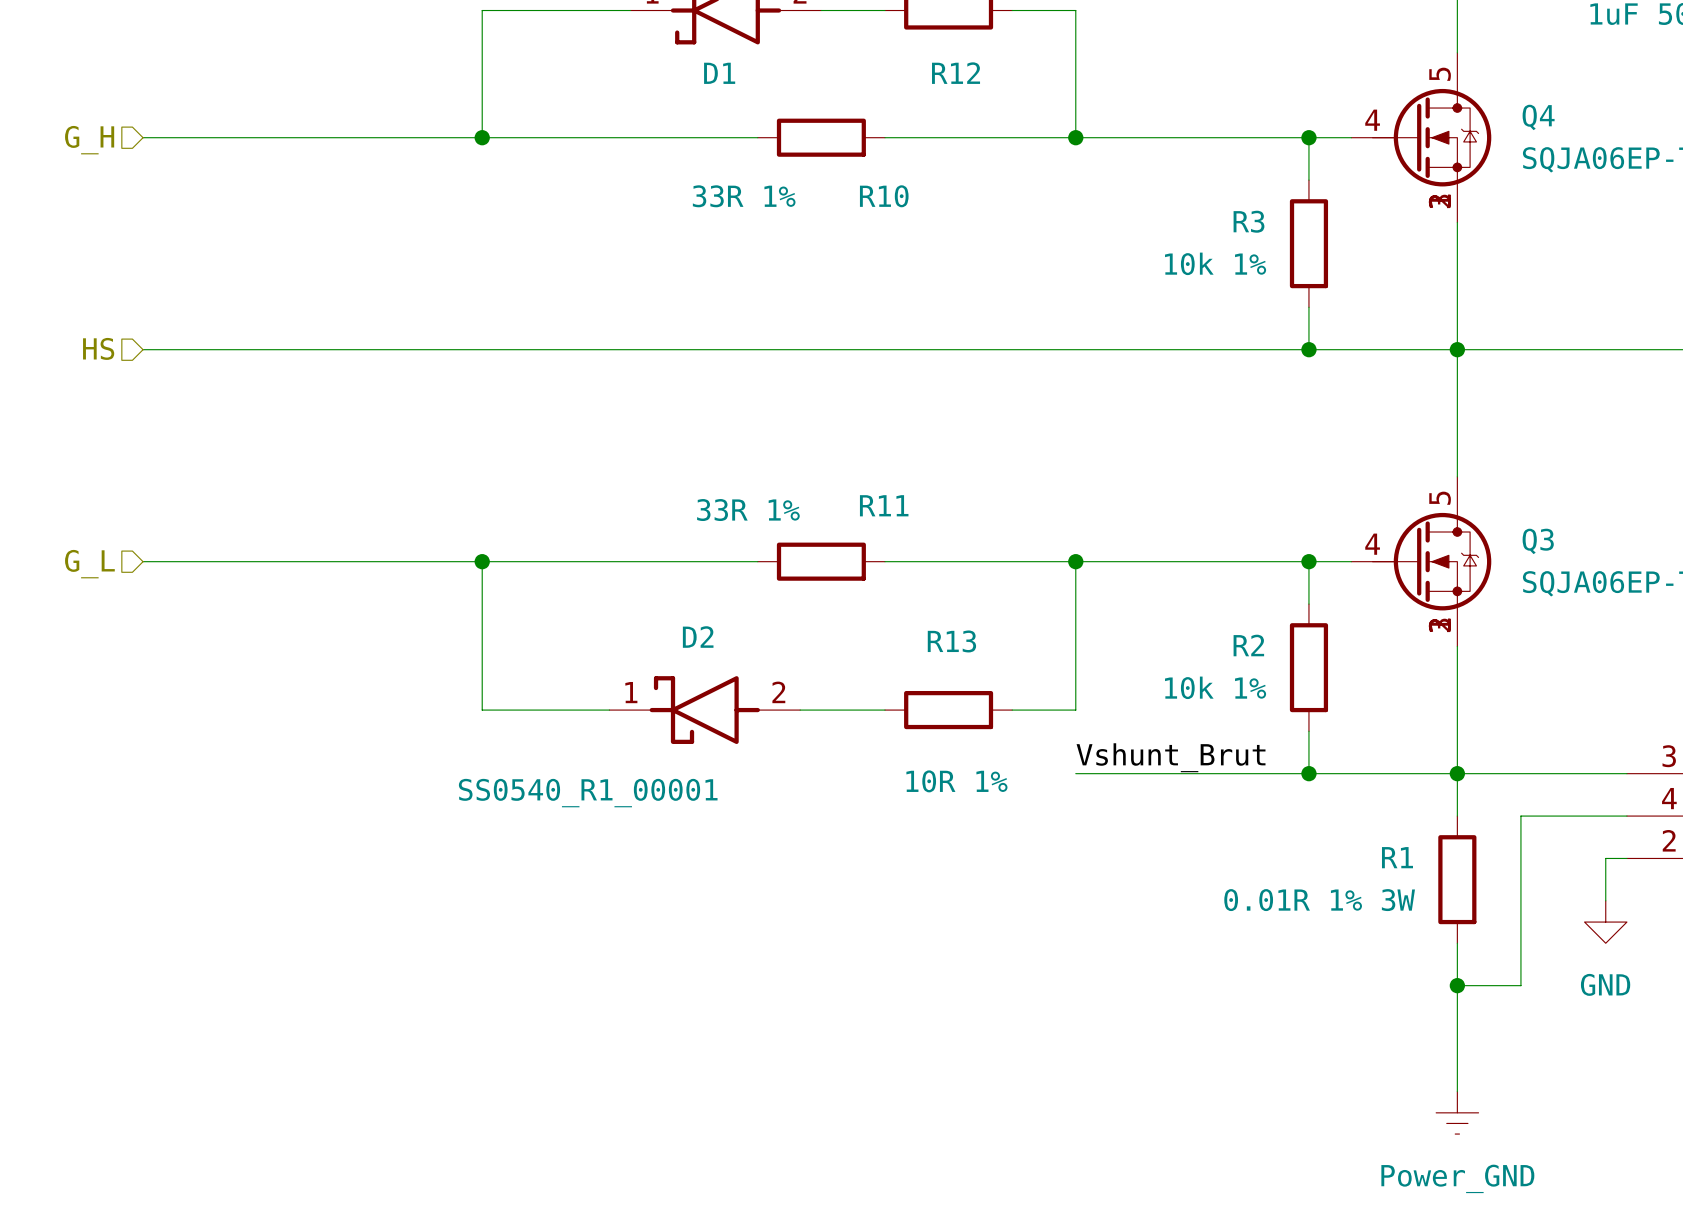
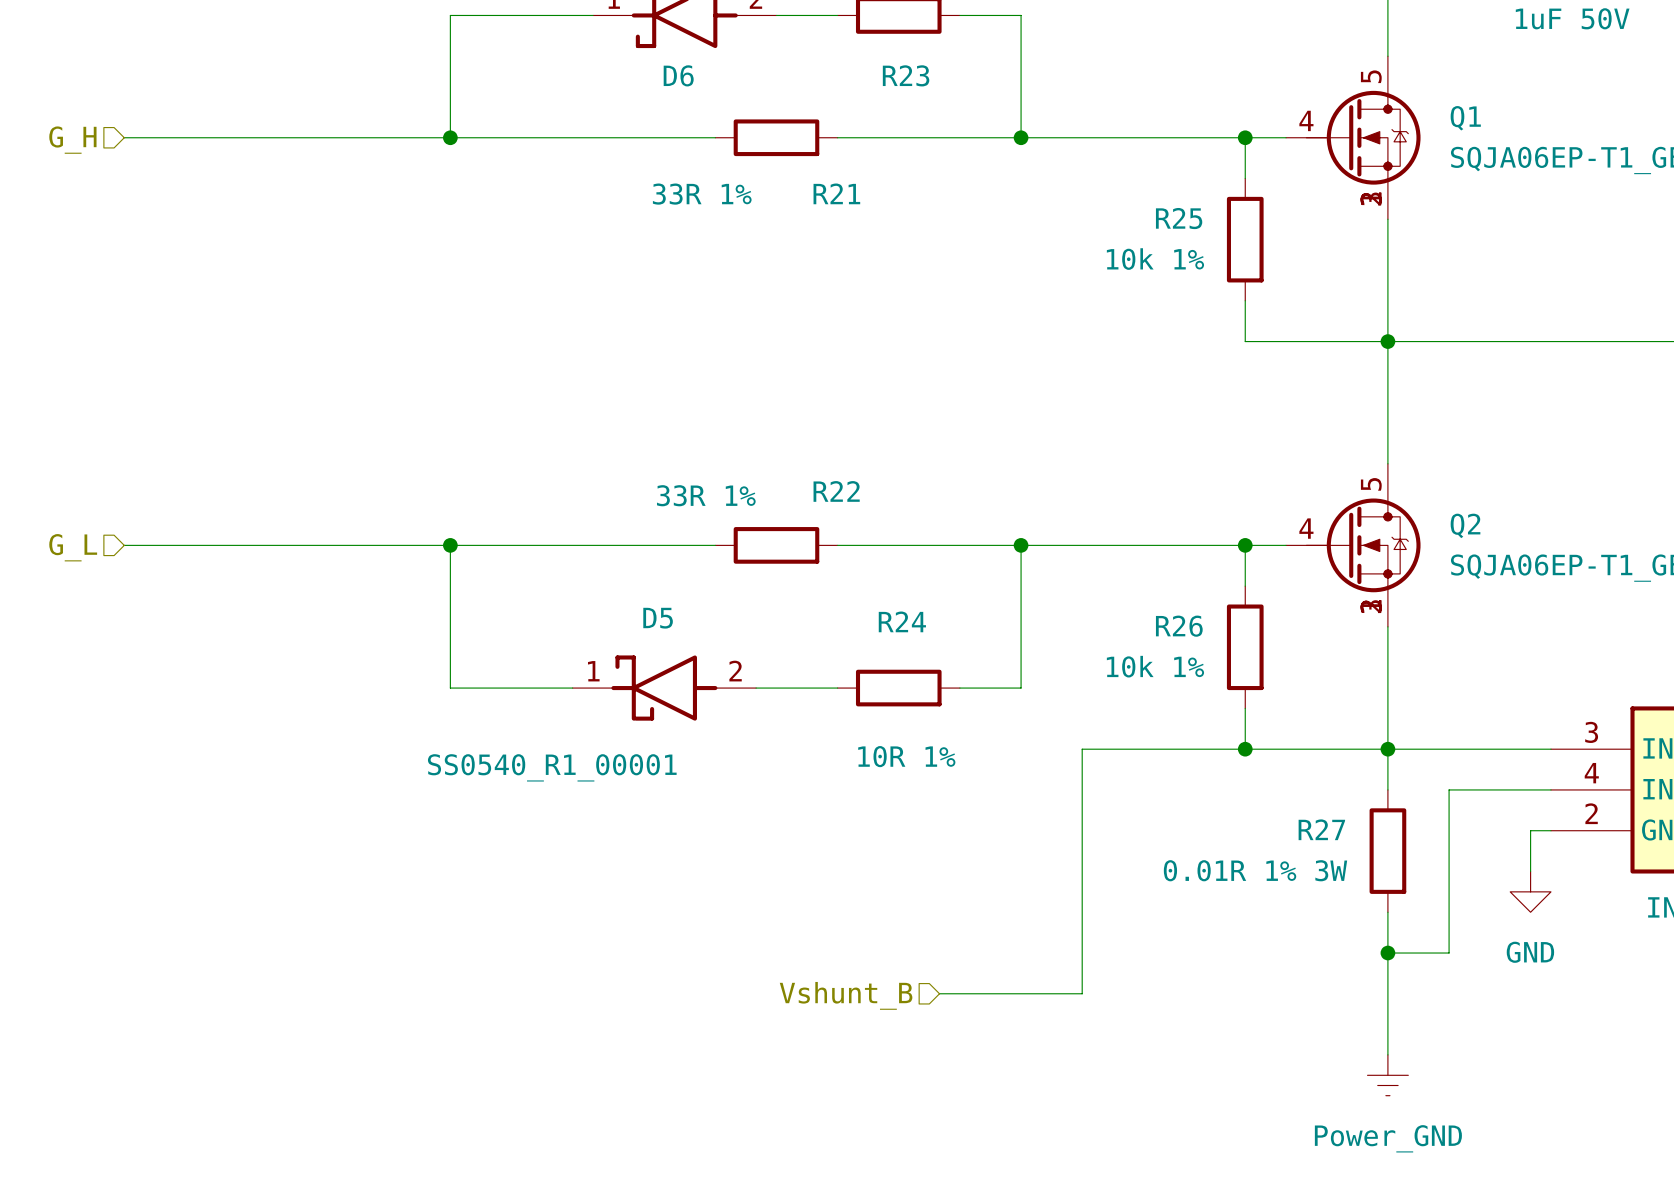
D1 name: D1 (719, 73) -> D6 (678, 75)
R12 name: R12 (956, 73) -> R23 (906, 75)
Q4 name: Q4 (1538, 117) -> Q1 (1465, 118)
R10 name: R10 (884, 196) -> R21 (836, 193)
R3 name: R3 (1248, 221) -> R25 (1179, 218)
hierarchical label: HS (98, 348) -> none
wire: (143, 349) (1308, 349) -> none
junction: (1308, 349) -> none
R11 name: R11 (884, 505) -> R22 (836, 491)
Q3 name: Q3 (1538, 541) -> Q2 (1465, 525)
D2 name: D2 (698, 637) -> D5 (658, 618)
R13 name: R13 (951, 641) -> R24 (902, 621)
R2 name: R2 (1248, 645) -> R26 (1179, 626)
label: Vshunt_Brut (1171, 757) -> none
wire: (1075, 773) (1139, 773) -> (939, 993) (1082, 993) (1082, 749)
R1 name: R1 (1397, 857) -> R27 (1321, 829)
hierarchical label: none -> Vshunt_B (846, 995)

